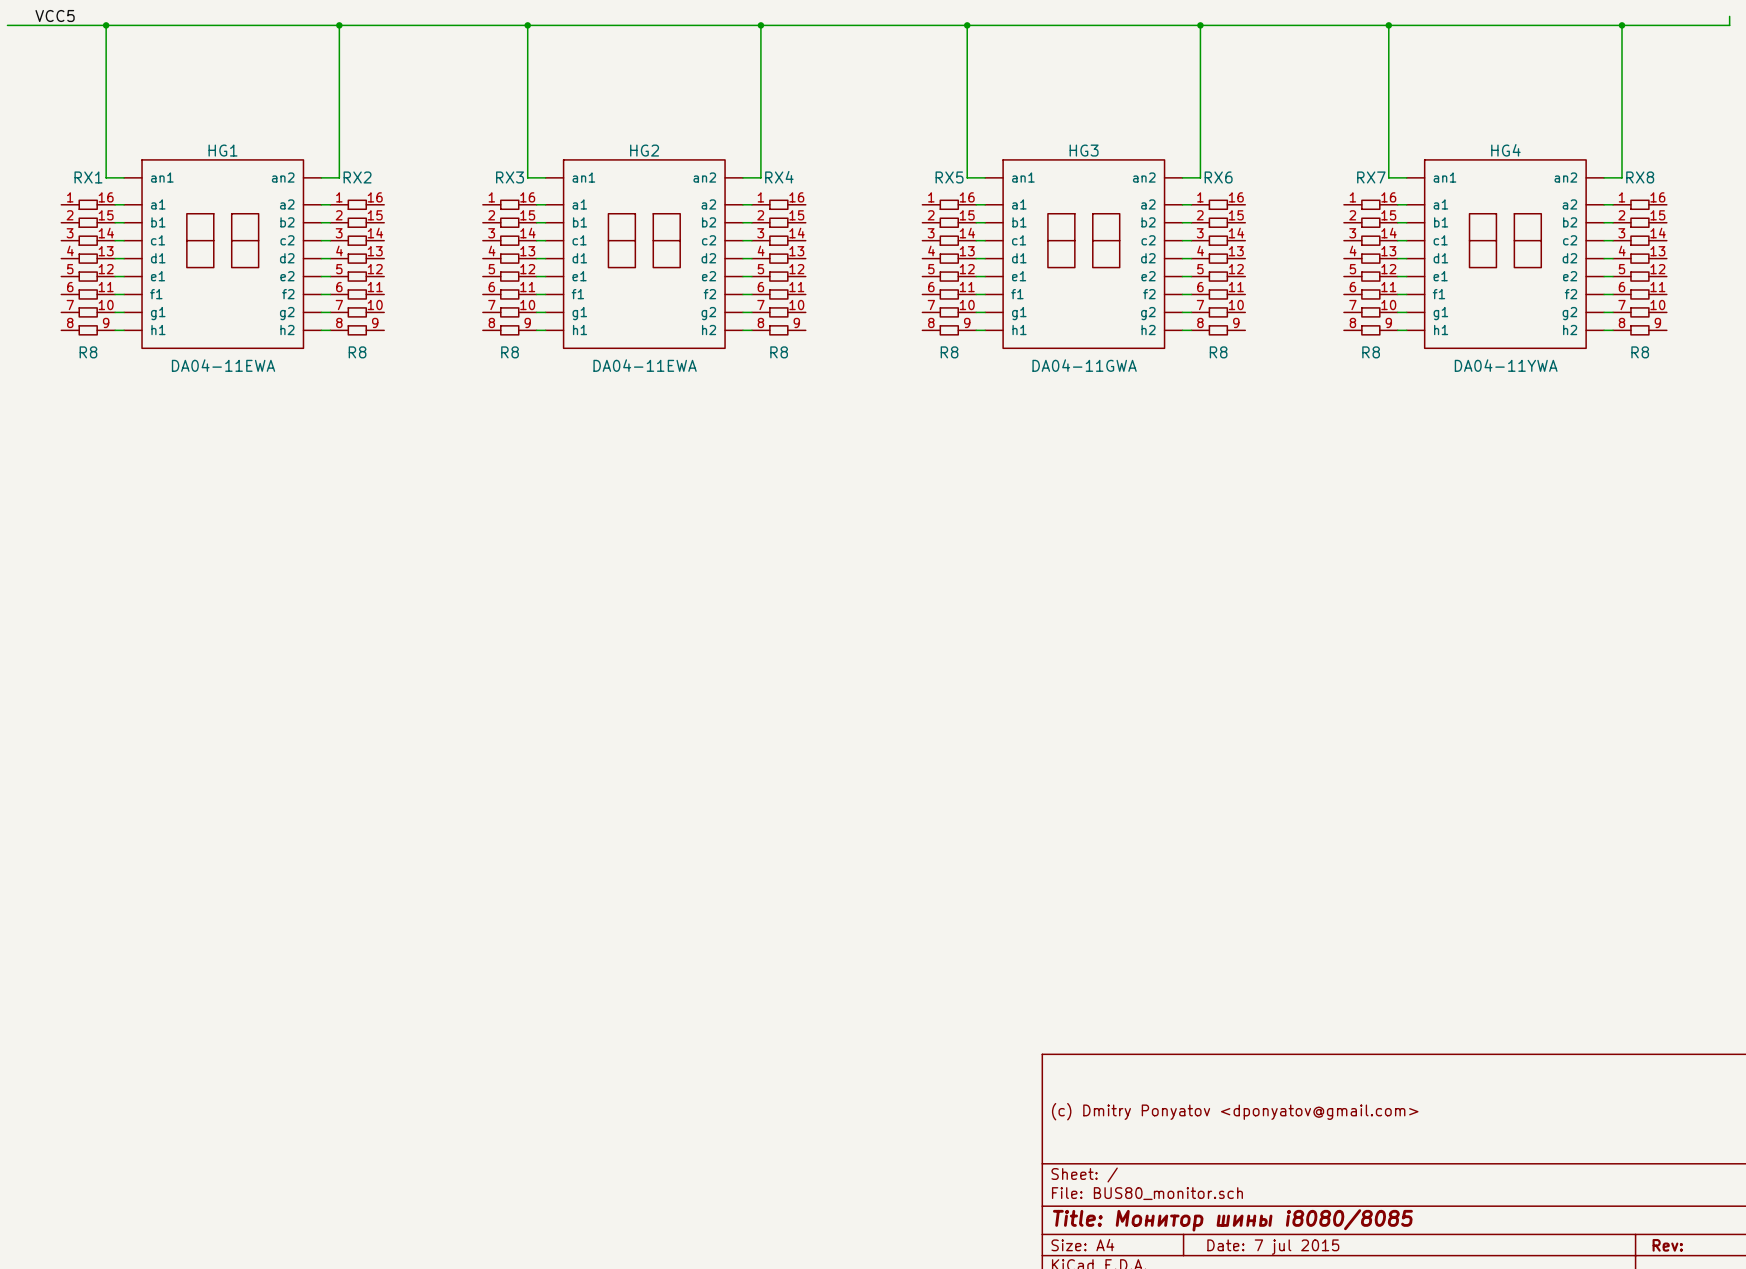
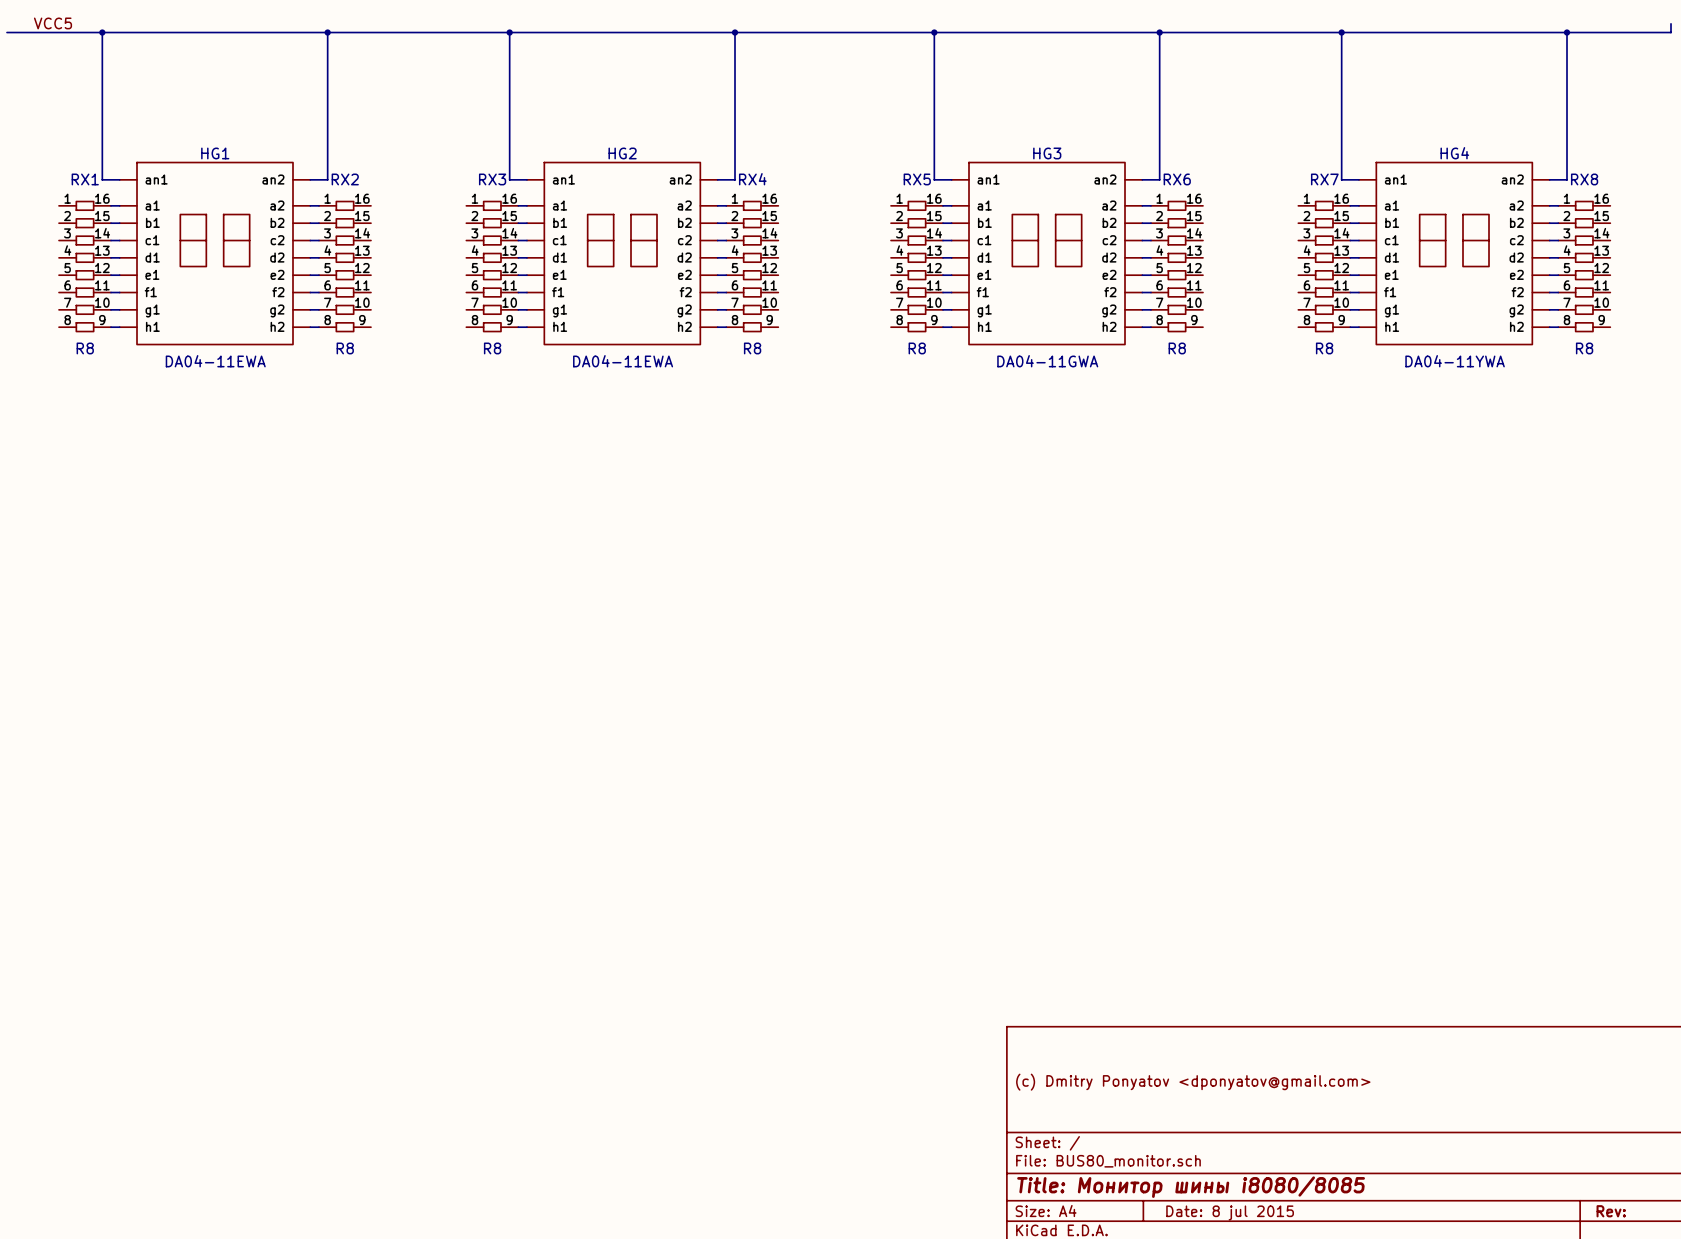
title block: Date: 7 jul 2015 (1273, 1247) -> Date: 8 jul 2015 (1230, 1212)

